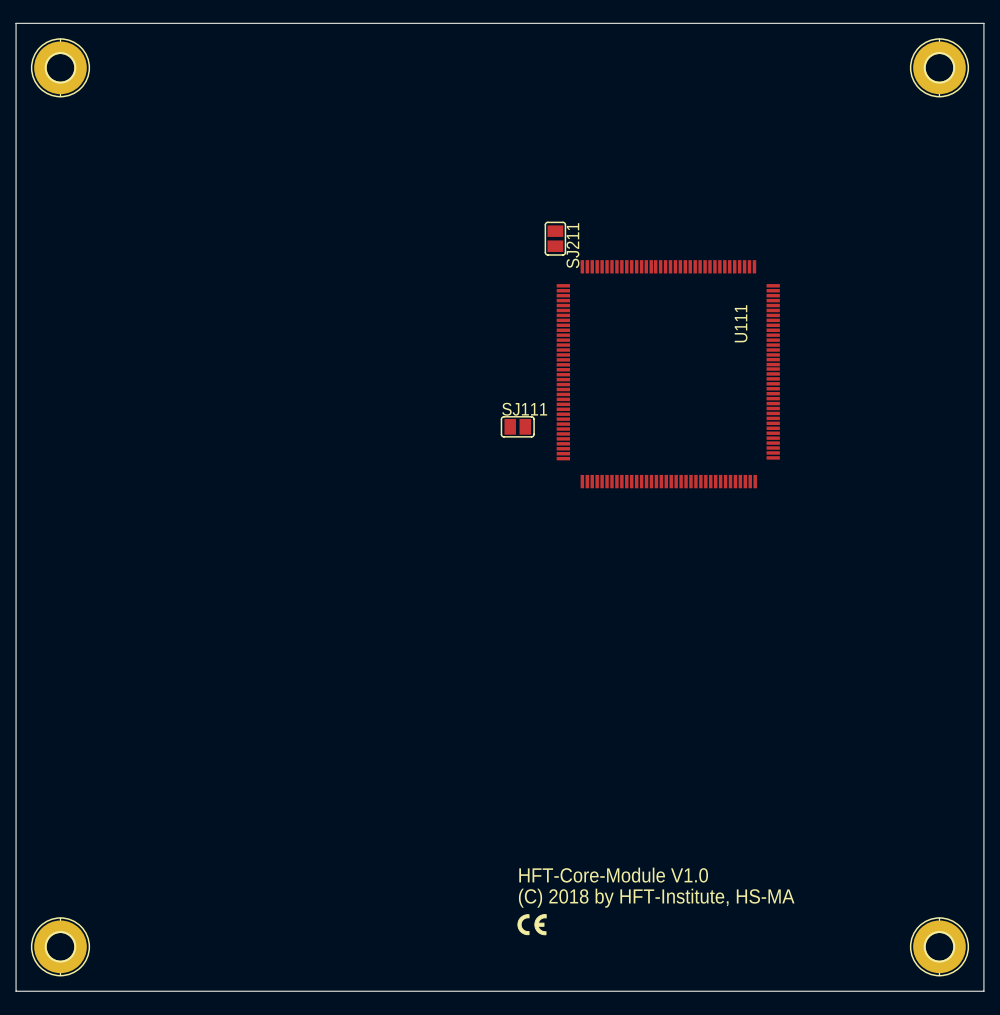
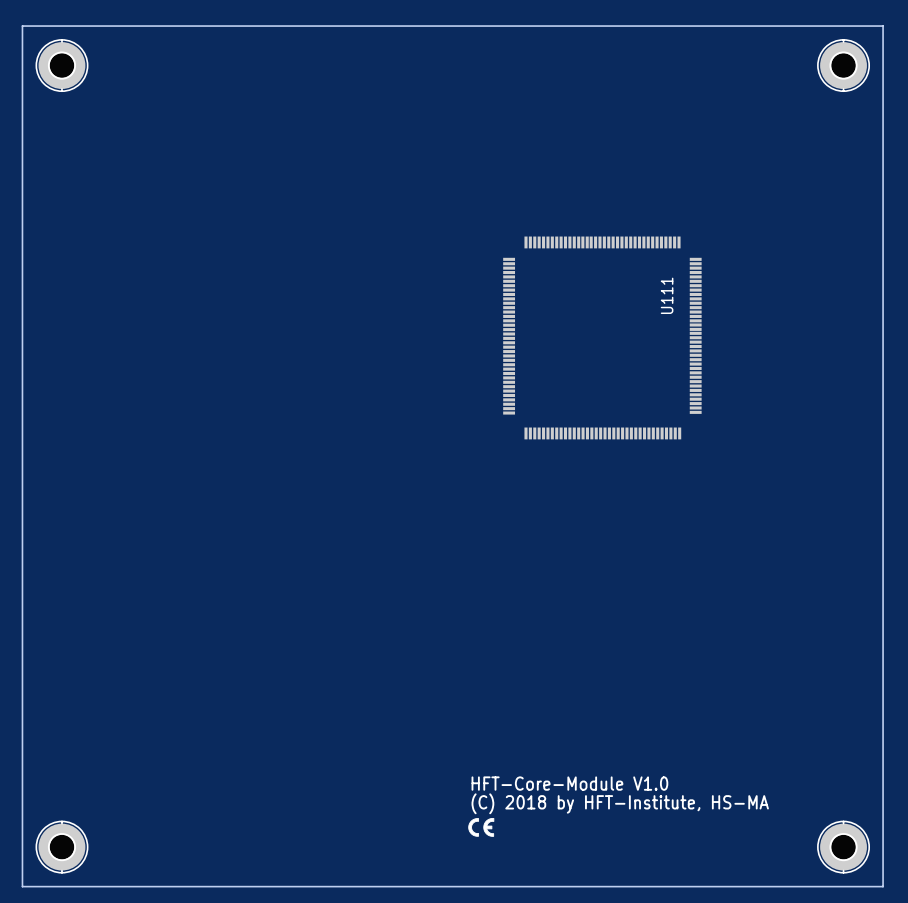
SJ211: (555, 238) -> none
SJ111: (517, 426) -> none

